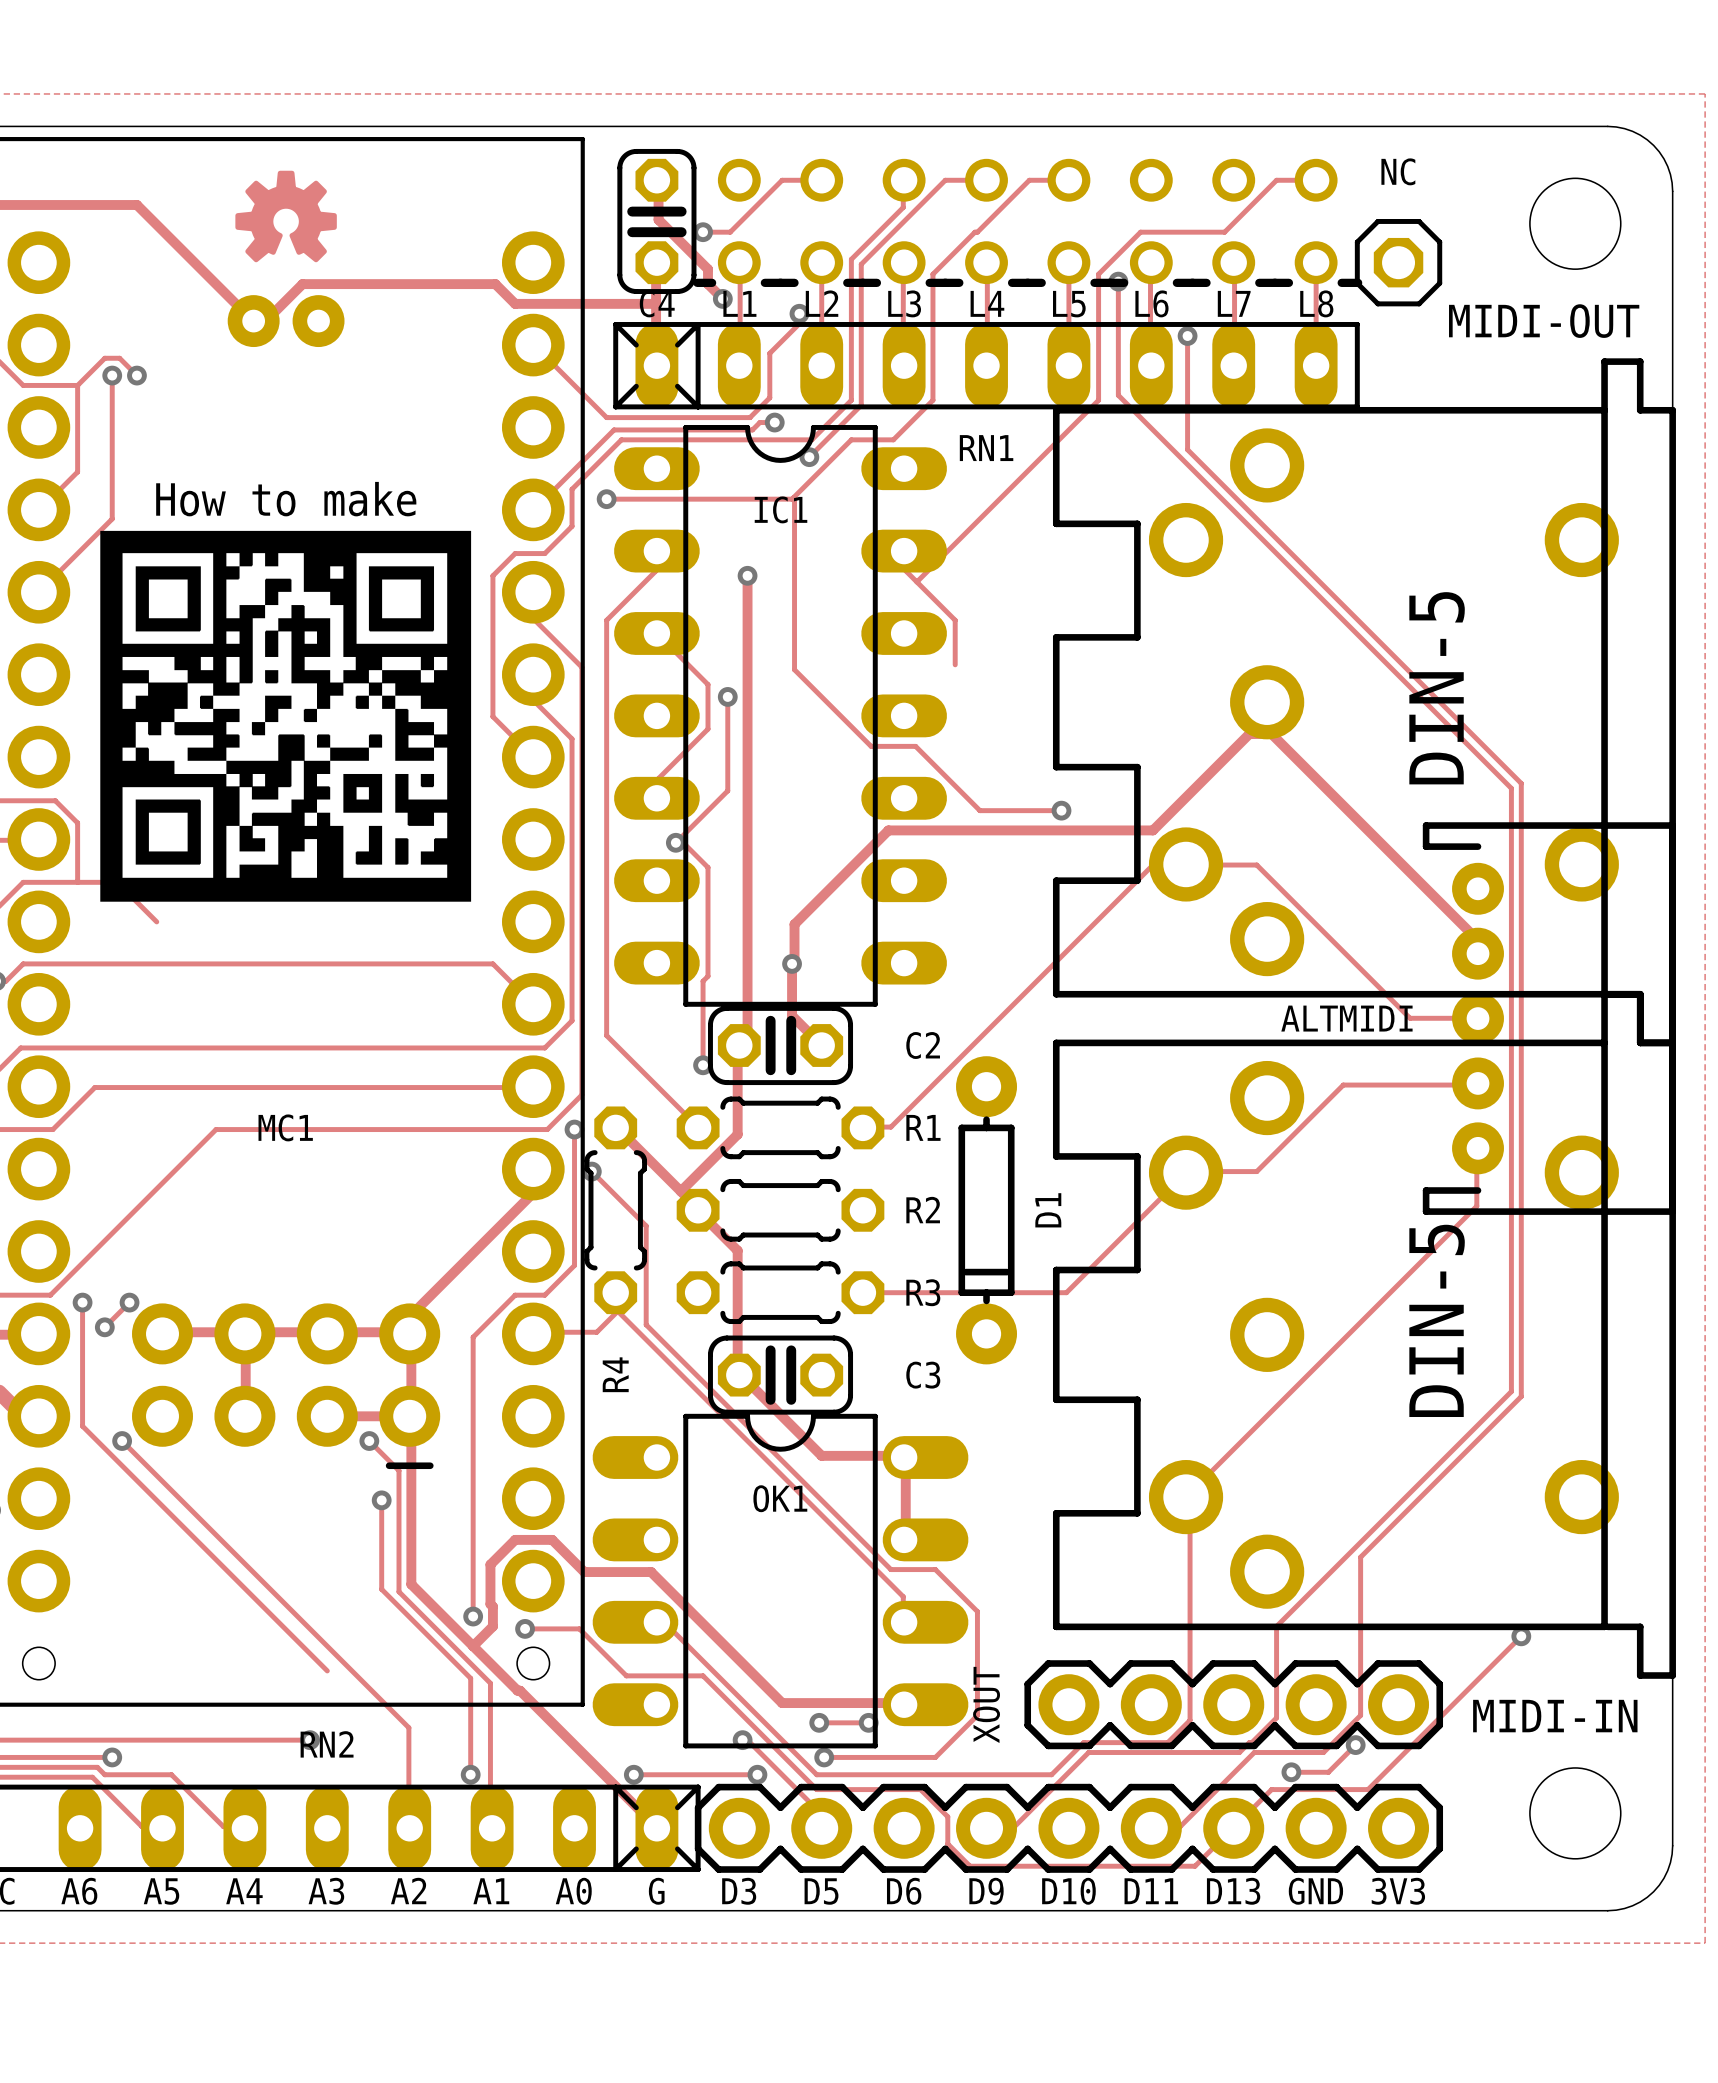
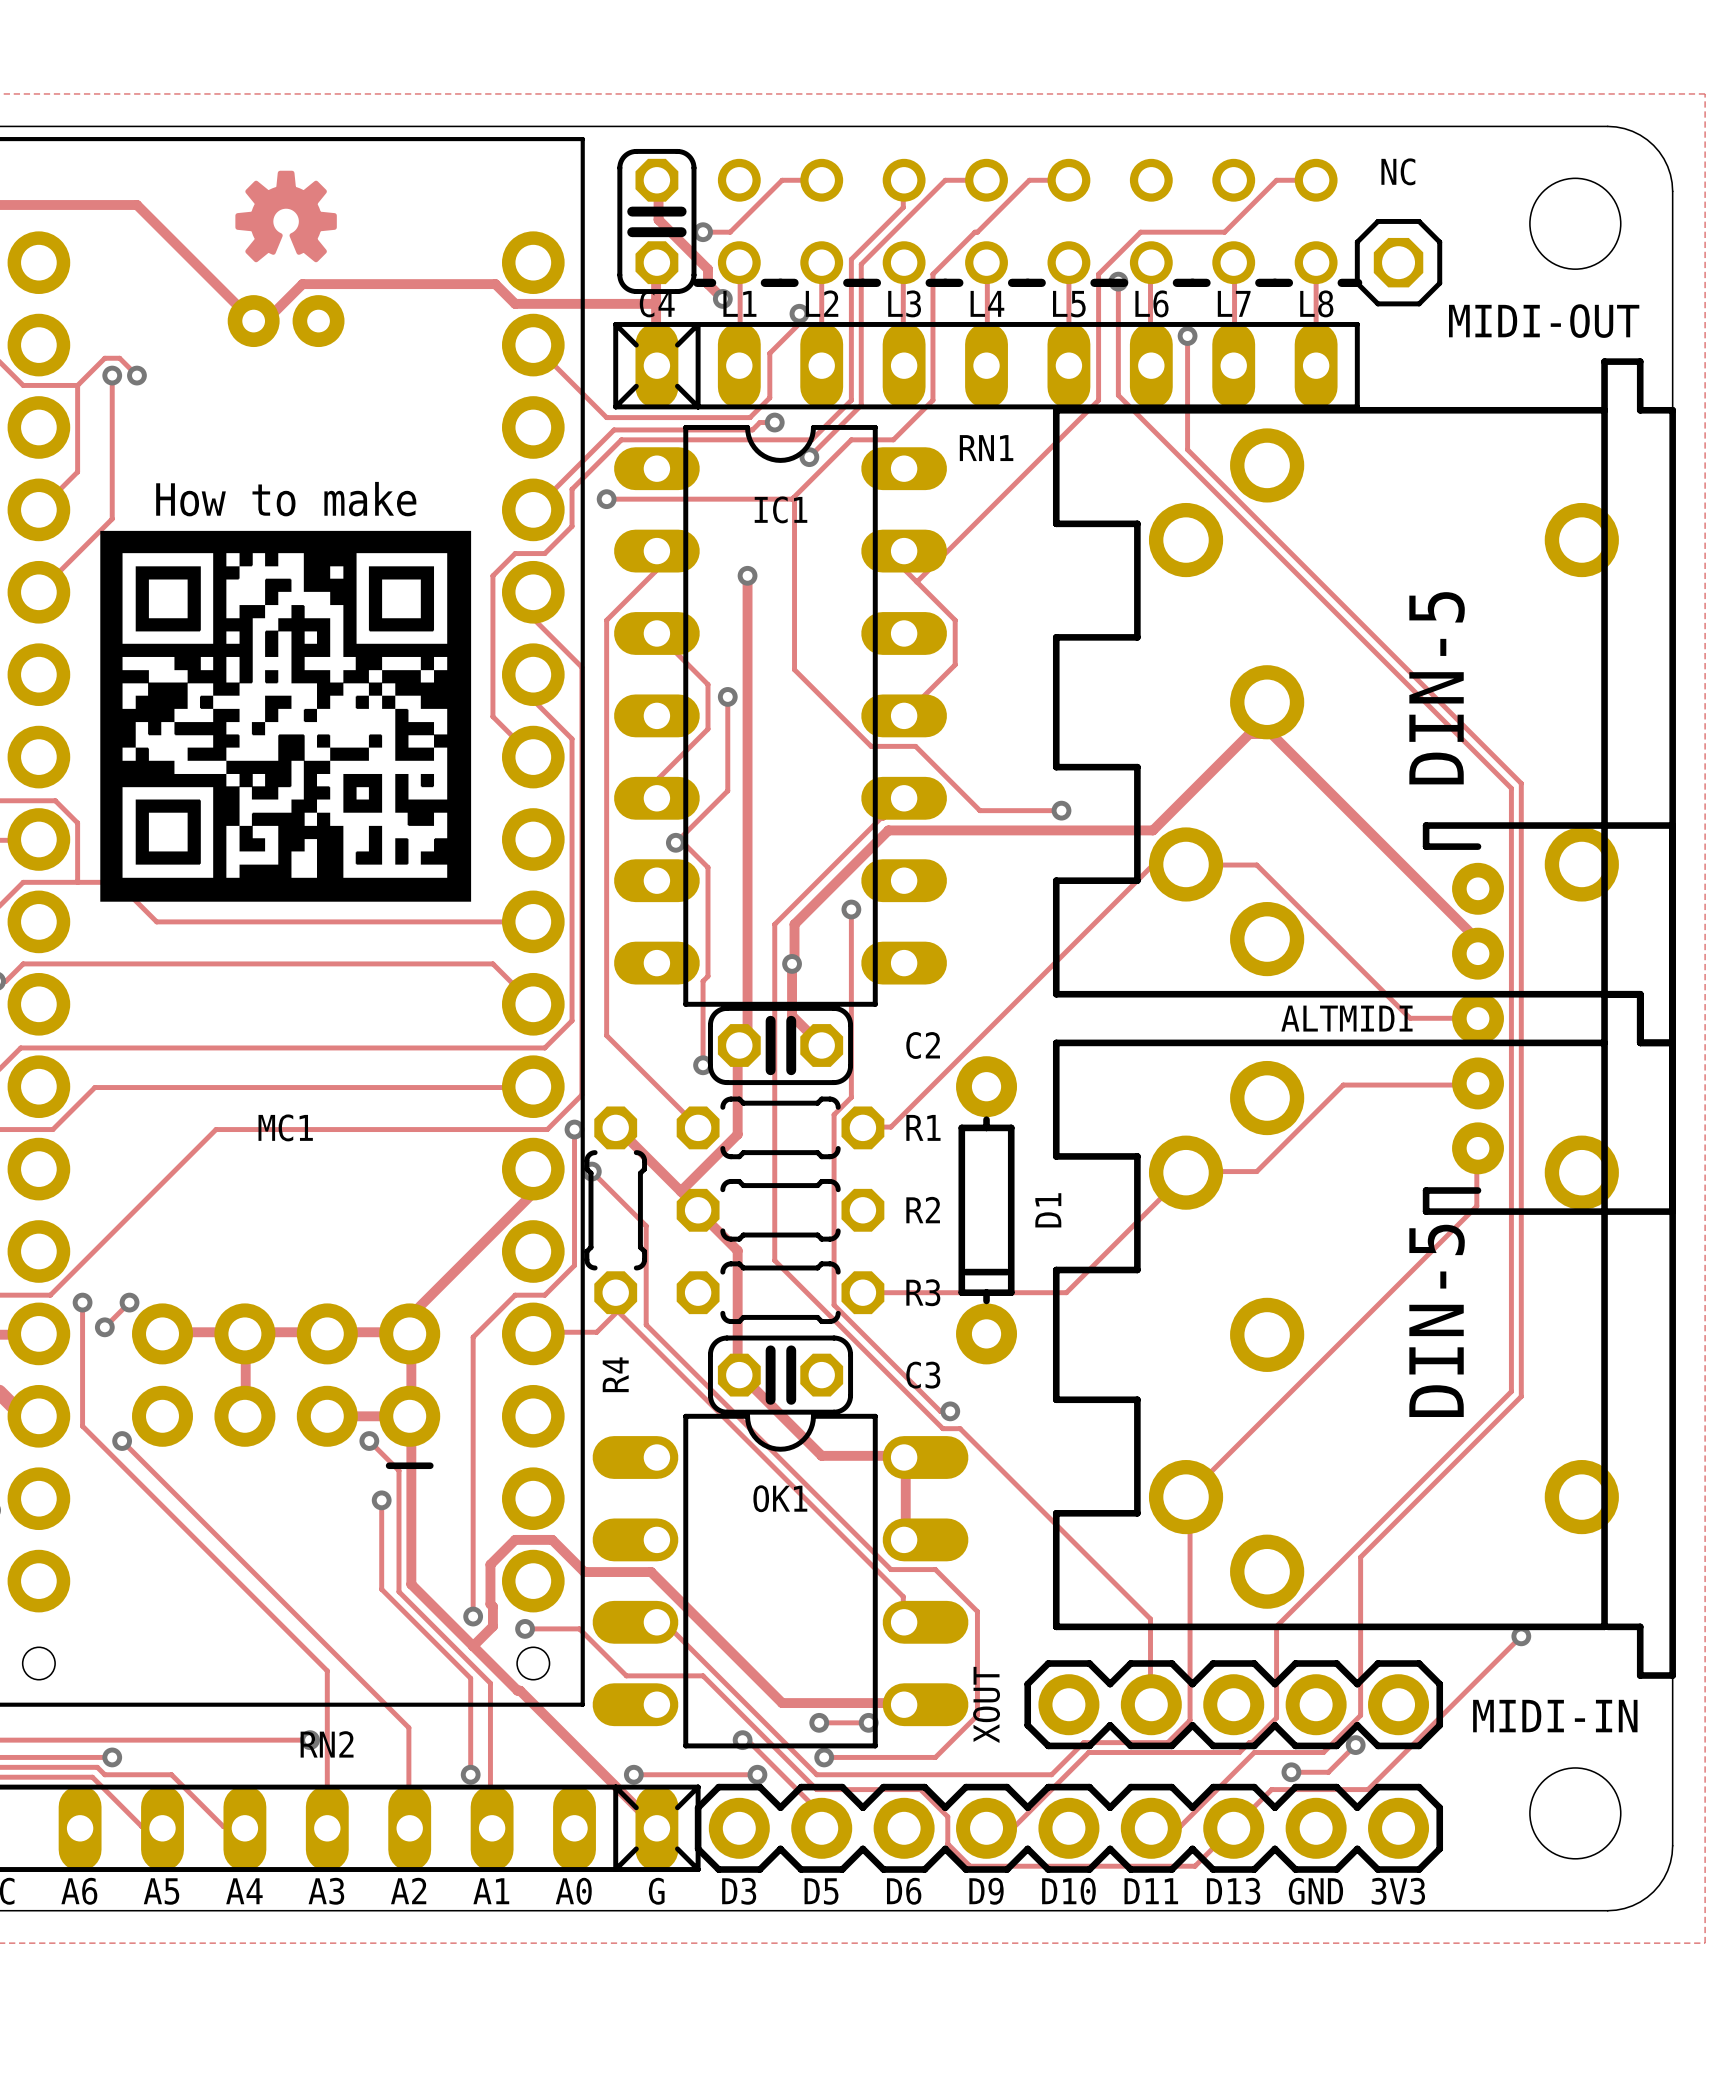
track: none -> (955, 664) (904, 715)
track: none -> (904, 798) (883, 818) (881, 818) (774, 924) (774, 1260) (942, 1428) (960, 1428) (1150, 1619) (1151, 1704)
track: none -> (851, 909) (851, 1097) (834, 1114) (834, 1305) (940, 1411) (950, 1411)
via: none -> (851, 909)
track: none -> (156, 921) (533, 921)
via: none -> (950, 1411)
track: none -> (327, 1670) (327, 1828)

